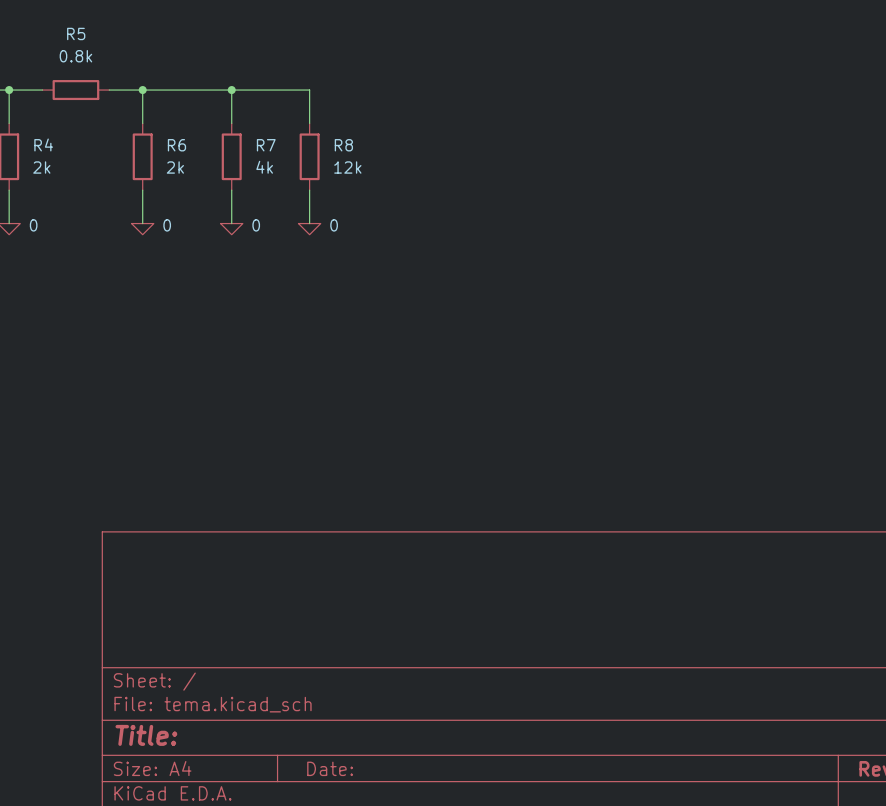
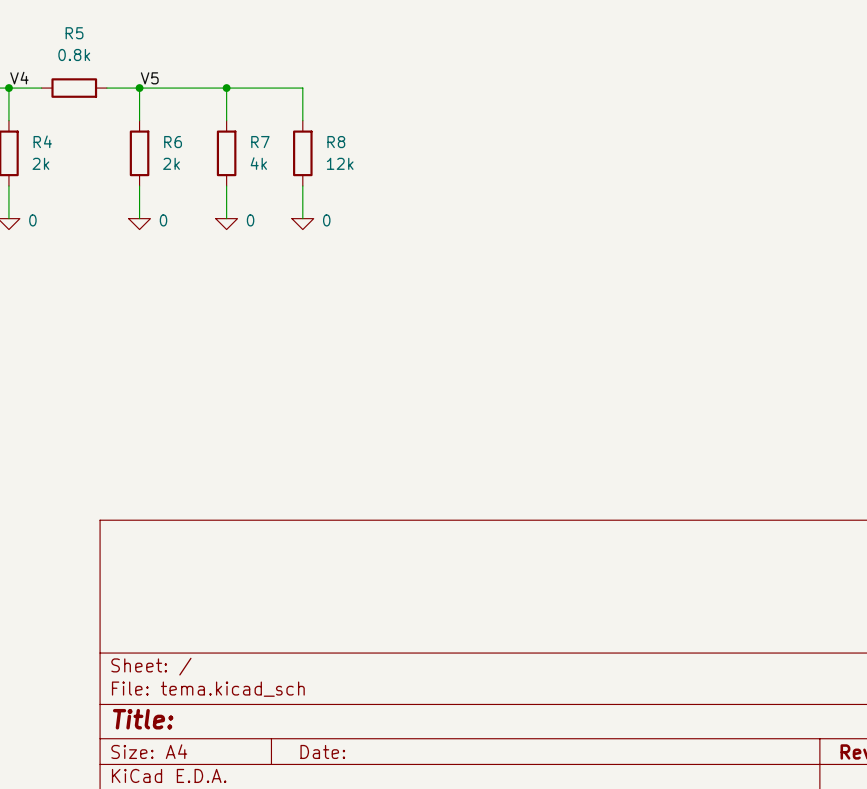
label: none -> V4 (19, 78)
label: none -> V5 (149, 78)

